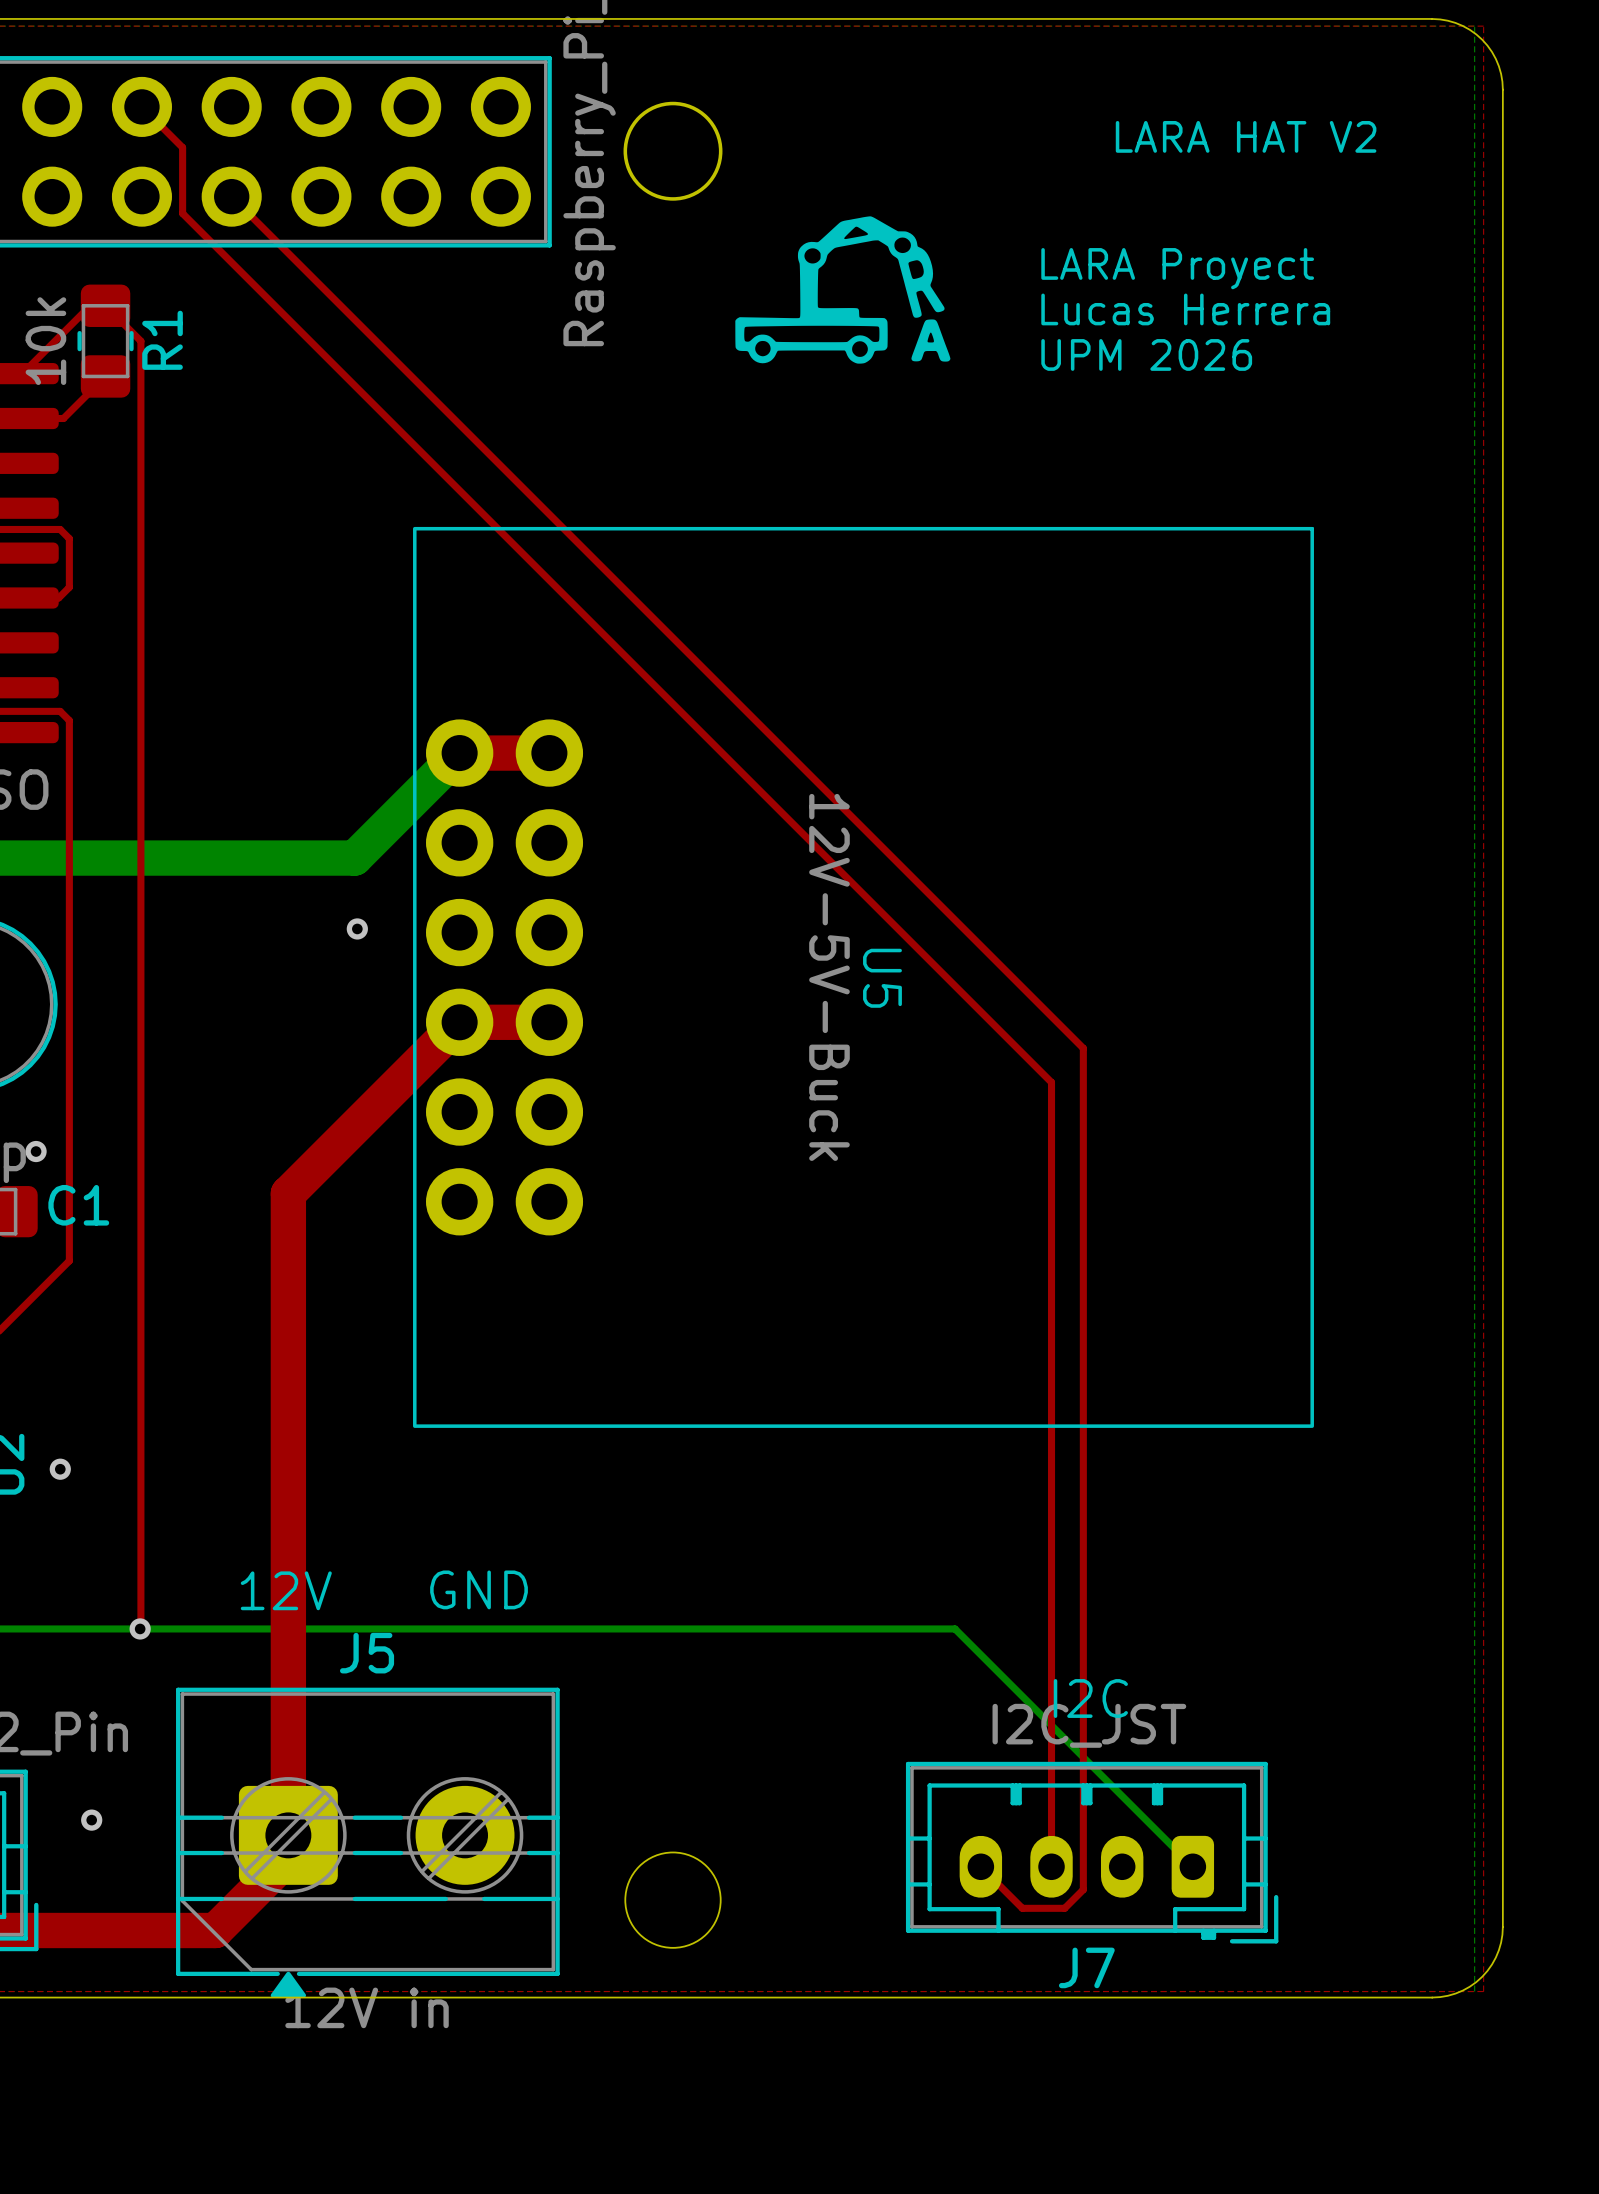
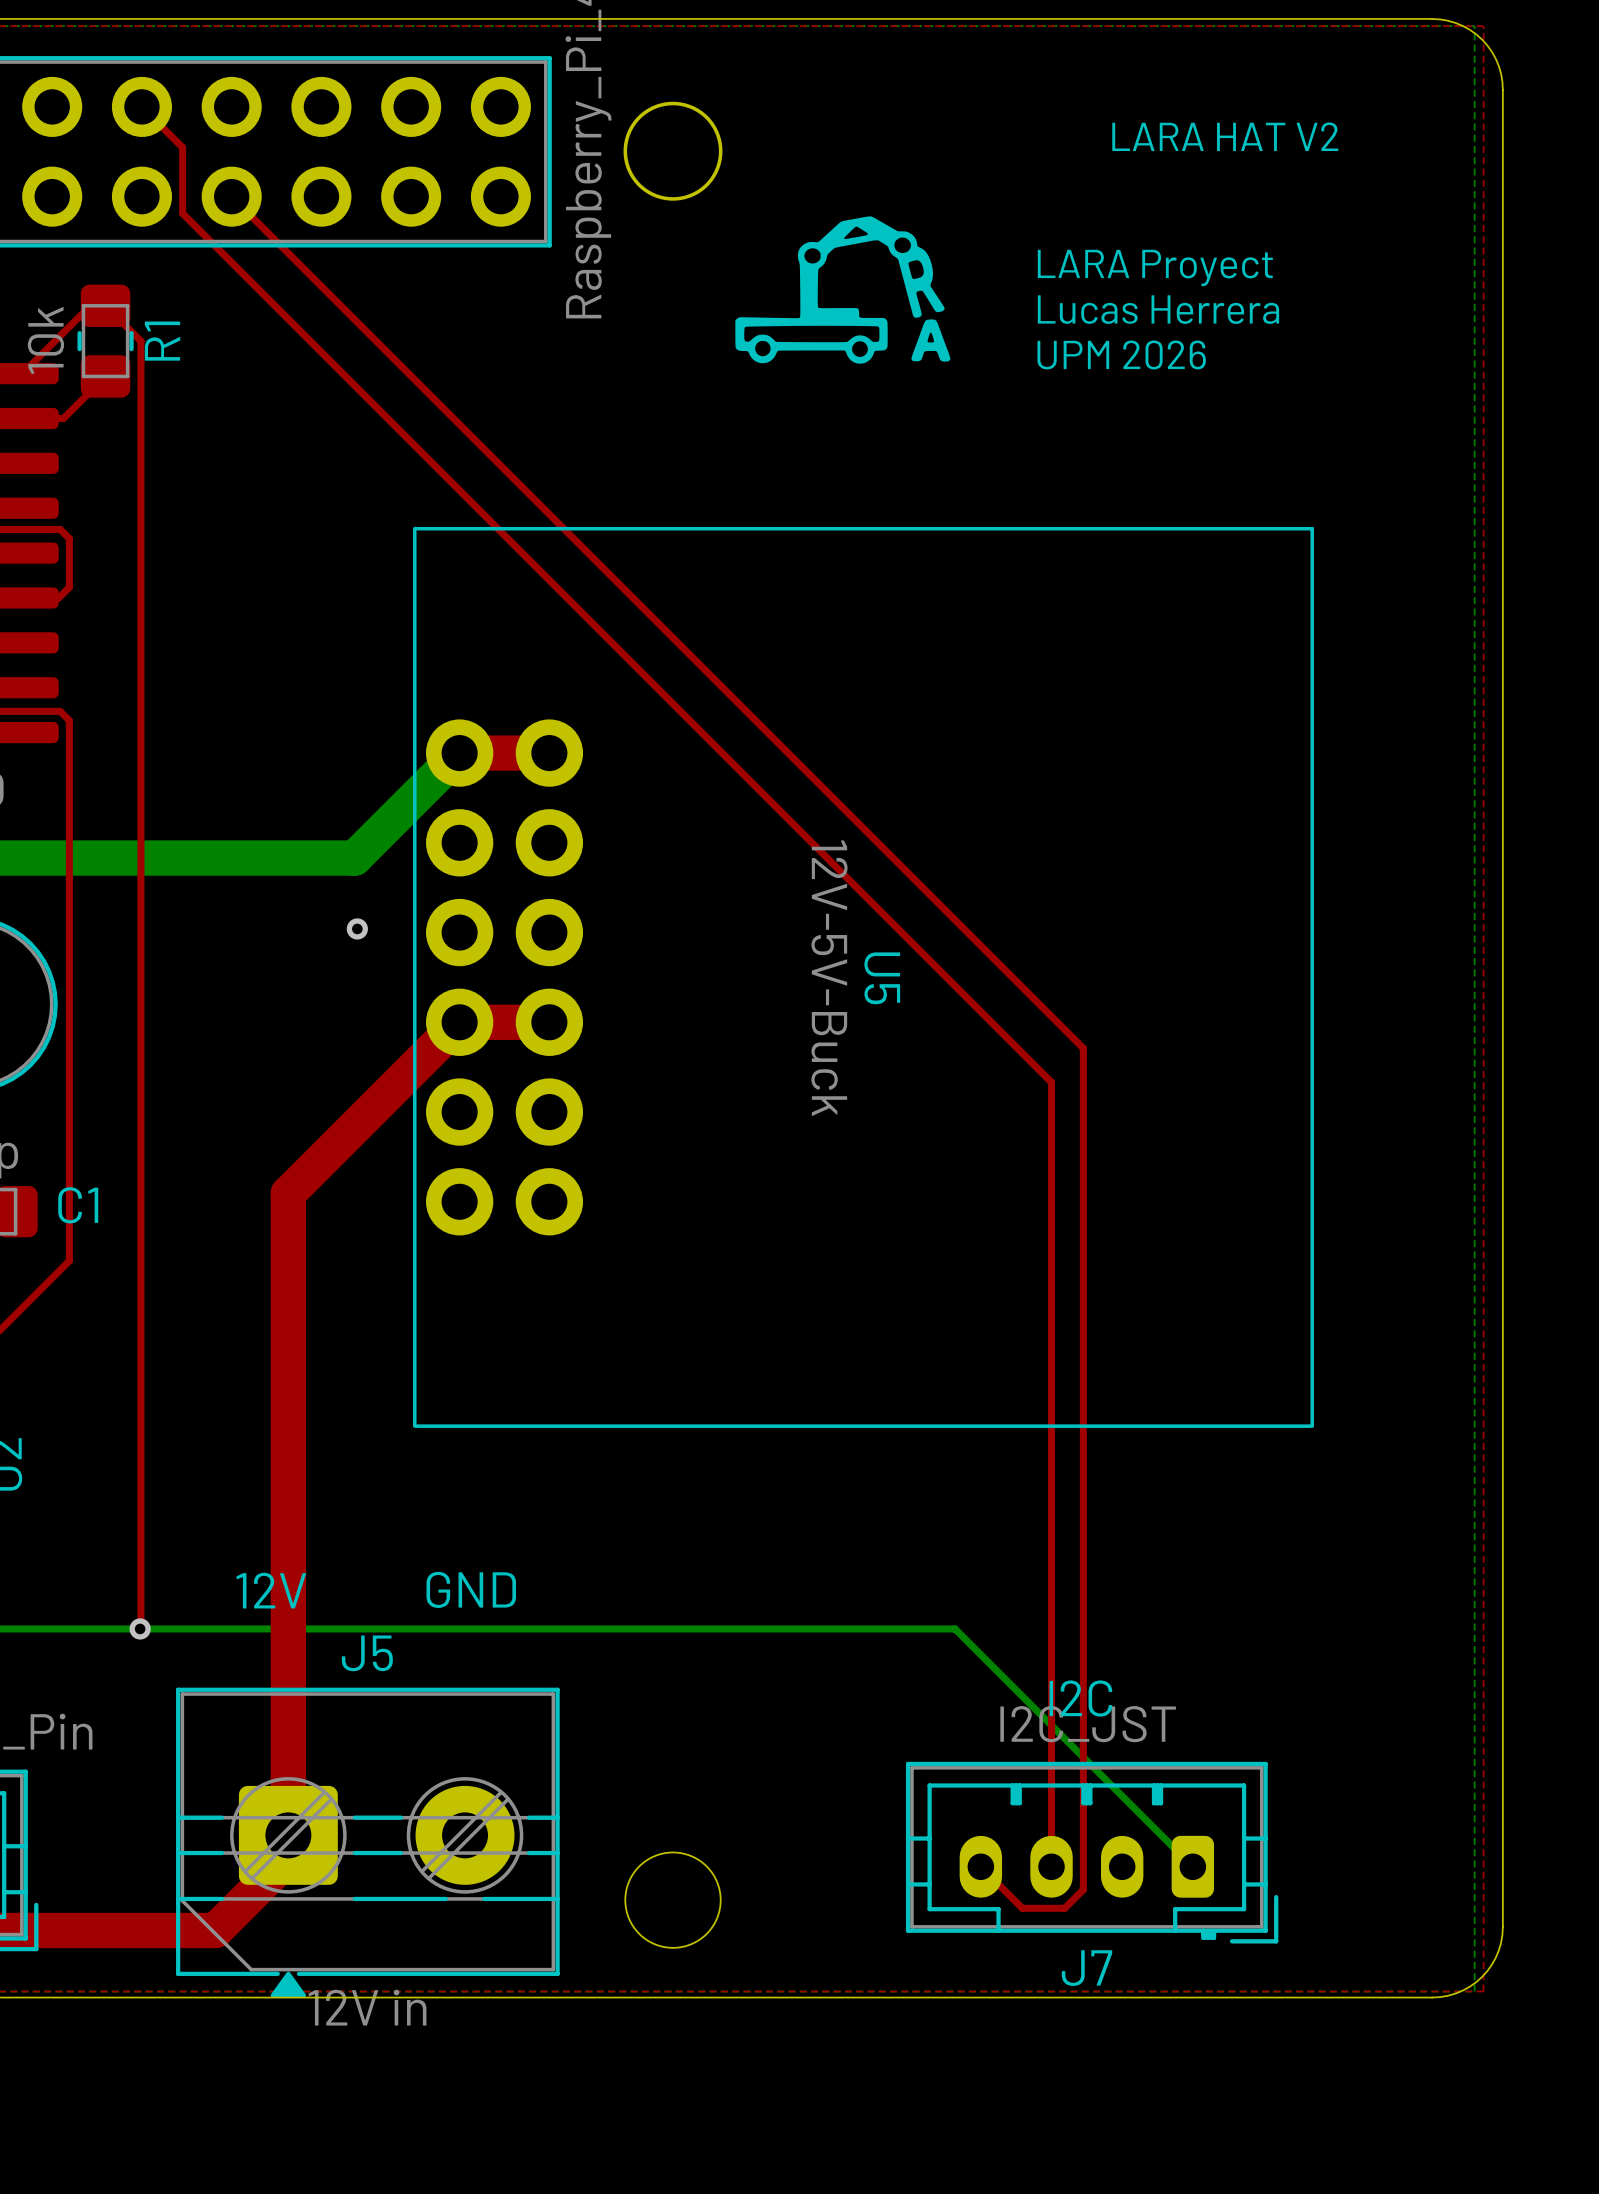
via: (36, 1151) -> none
via: (60, 1469) -> none
via: (91, 1820) -> none

